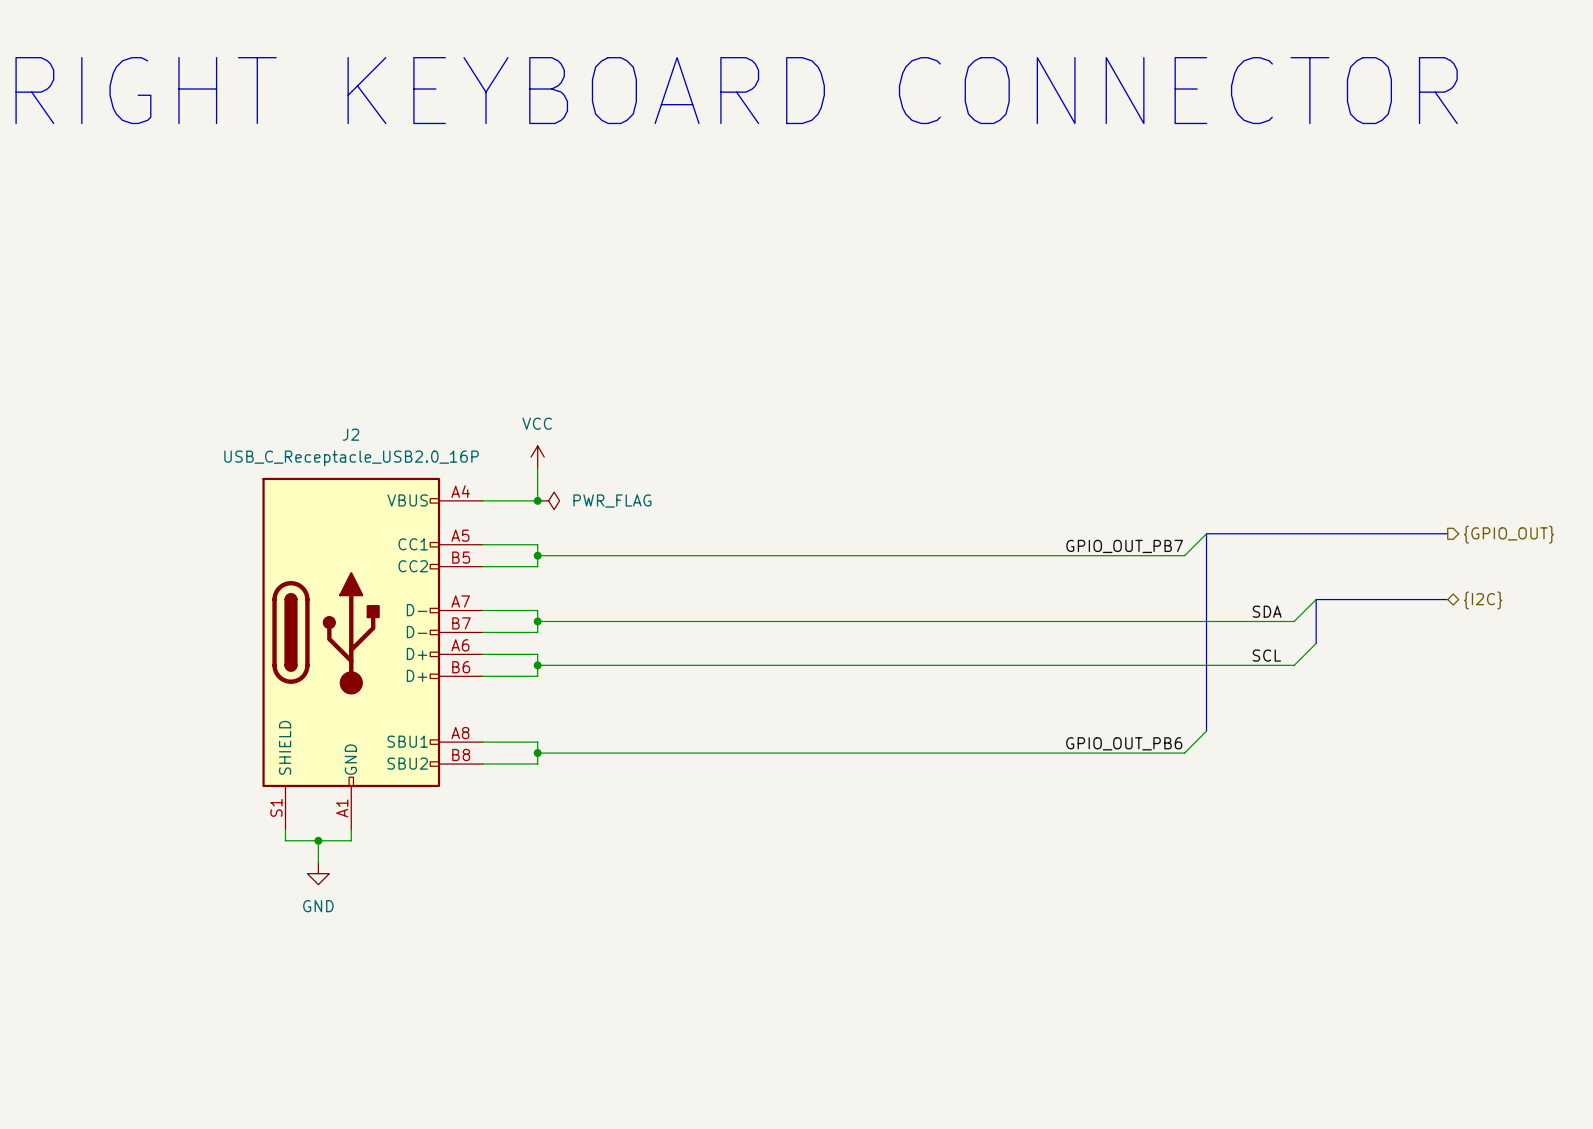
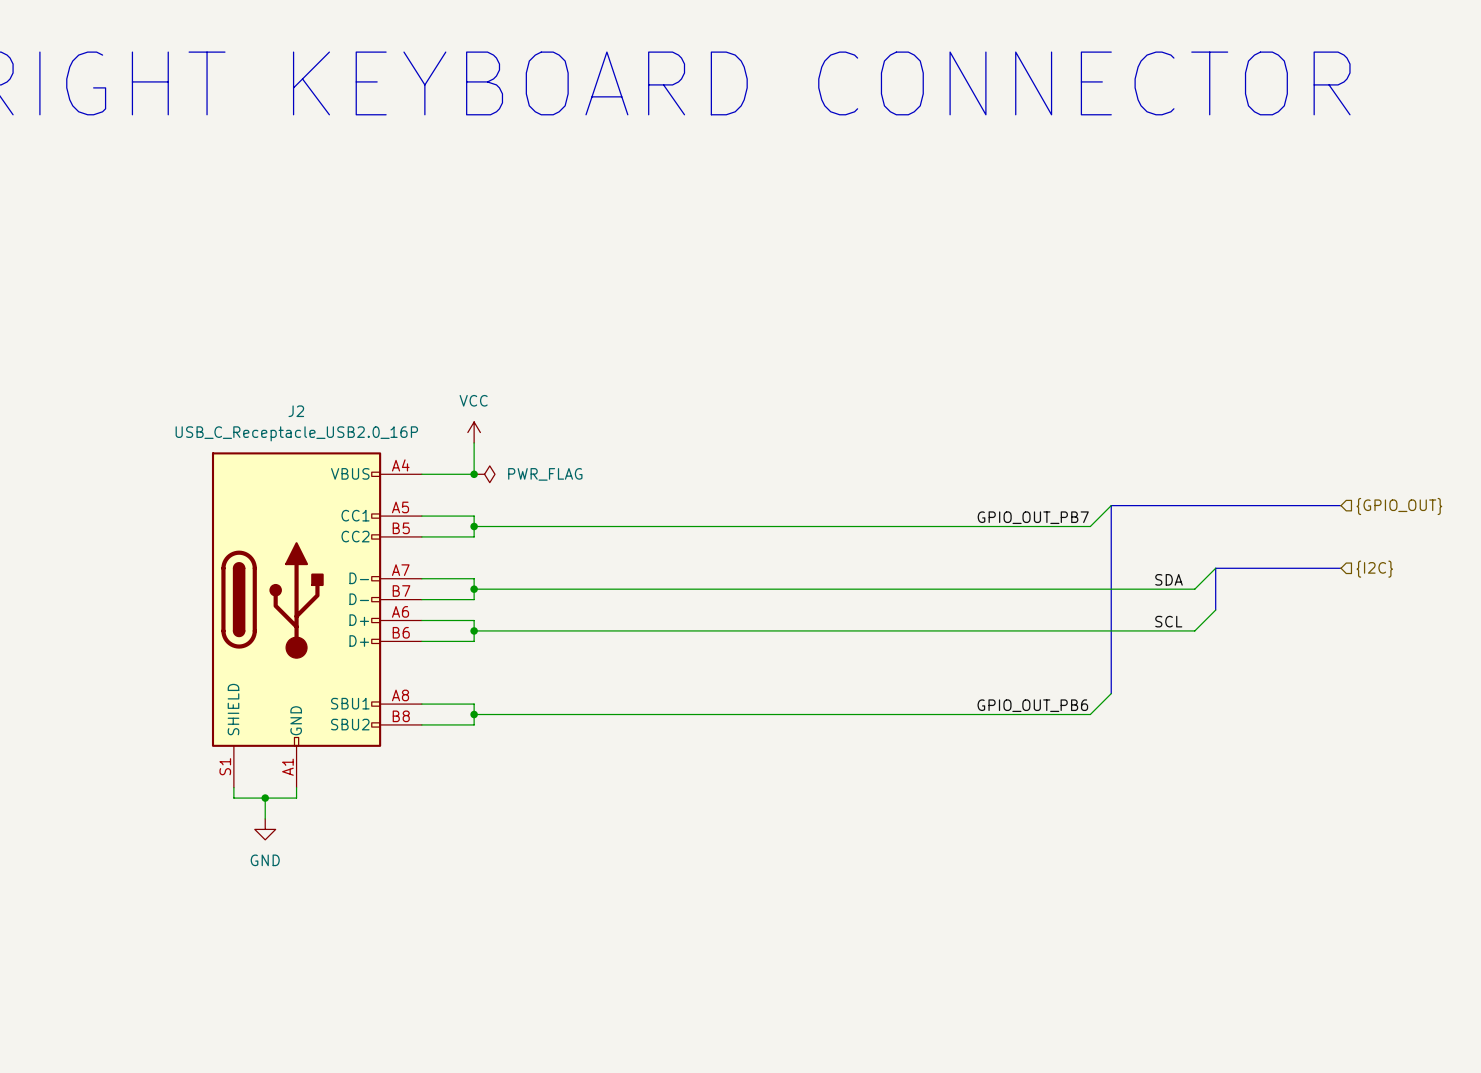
hierarchical label shape: output (1508, 534) -> input (1399, 506)
hierarchical label shape: bidirectional (1483, 600) -> input (1374, 569)

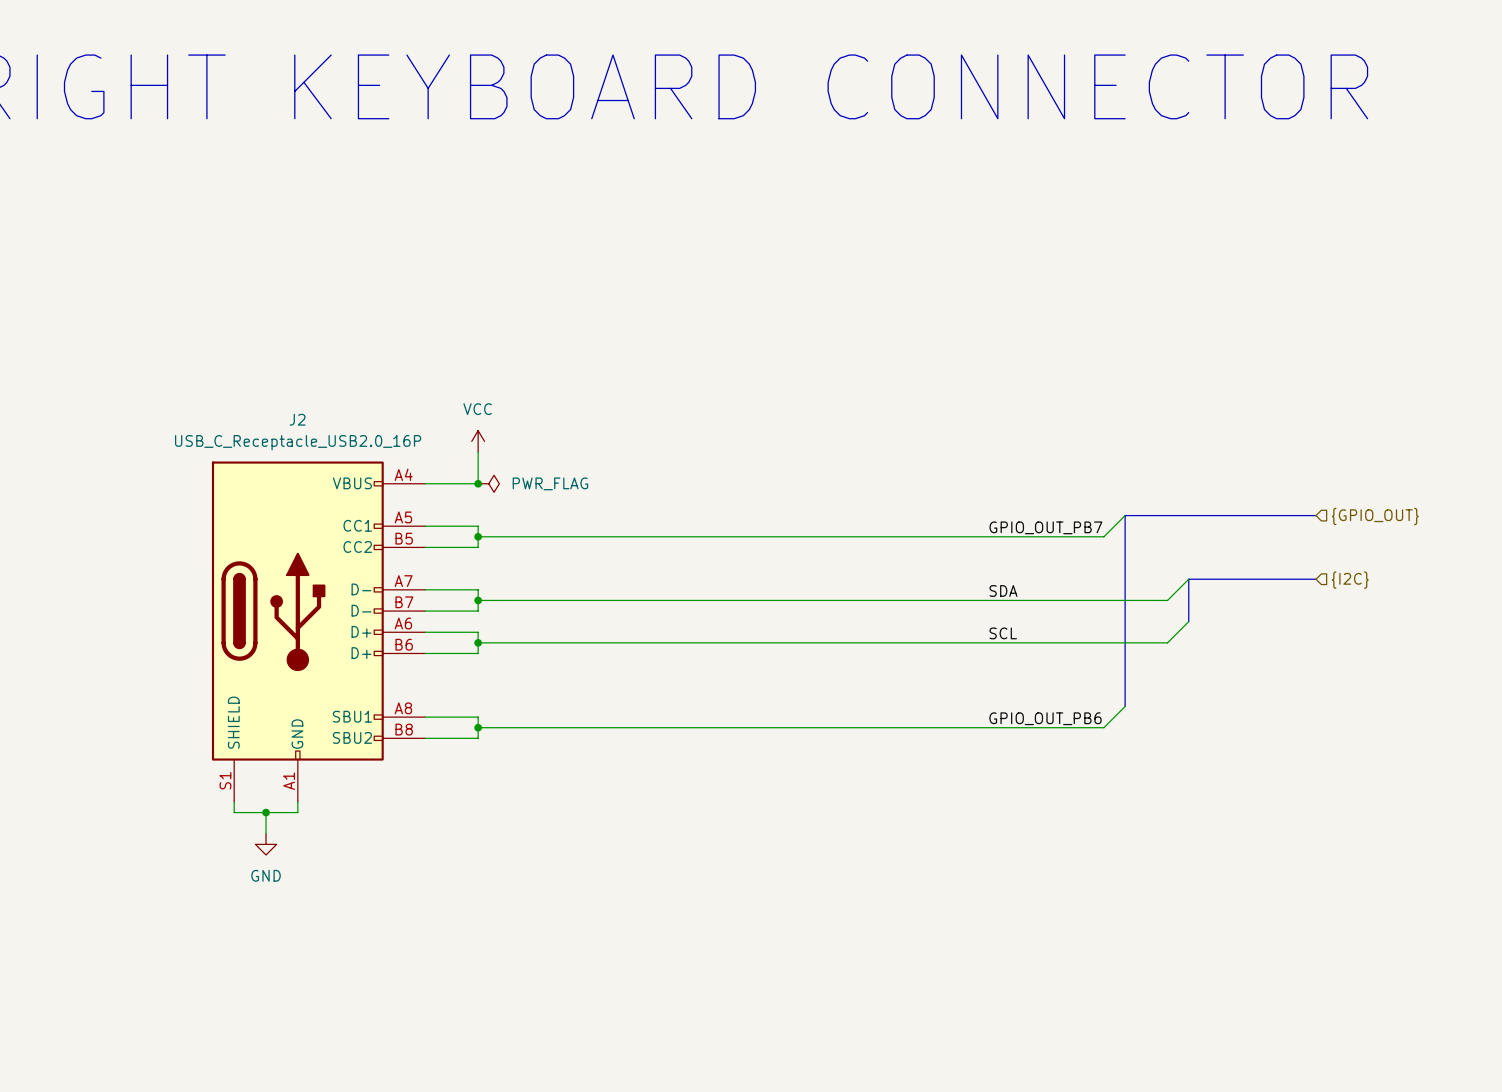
bus: (1299, 505) (1341, 505) -> none
hierarchical label position: {GPIO_OUT} (1399, 506) -> {GPIO_OUT} (1375, 516)
wire: (1215, 568) (1194, 589) (1153, 589) -> (1188, 579) (1167, 600)
bus: (1215, 568) (1215, 610) -> (1231, 579) (1188, 579) (1188, 621)
bus: (1299, 568) (1341, 568) -> none
hierarchical label position: {I2C} (1374, 569) -> {I2C} (1350, 580)
label position: SDA (1169, 579) -> SDA (1003, 590)
wire: (1215, 610) (1194, 630) (1153, 630) -> (1188, 621) (1167, 642)
label position: SCL (1168, 621) -> SCL (1003, 633)

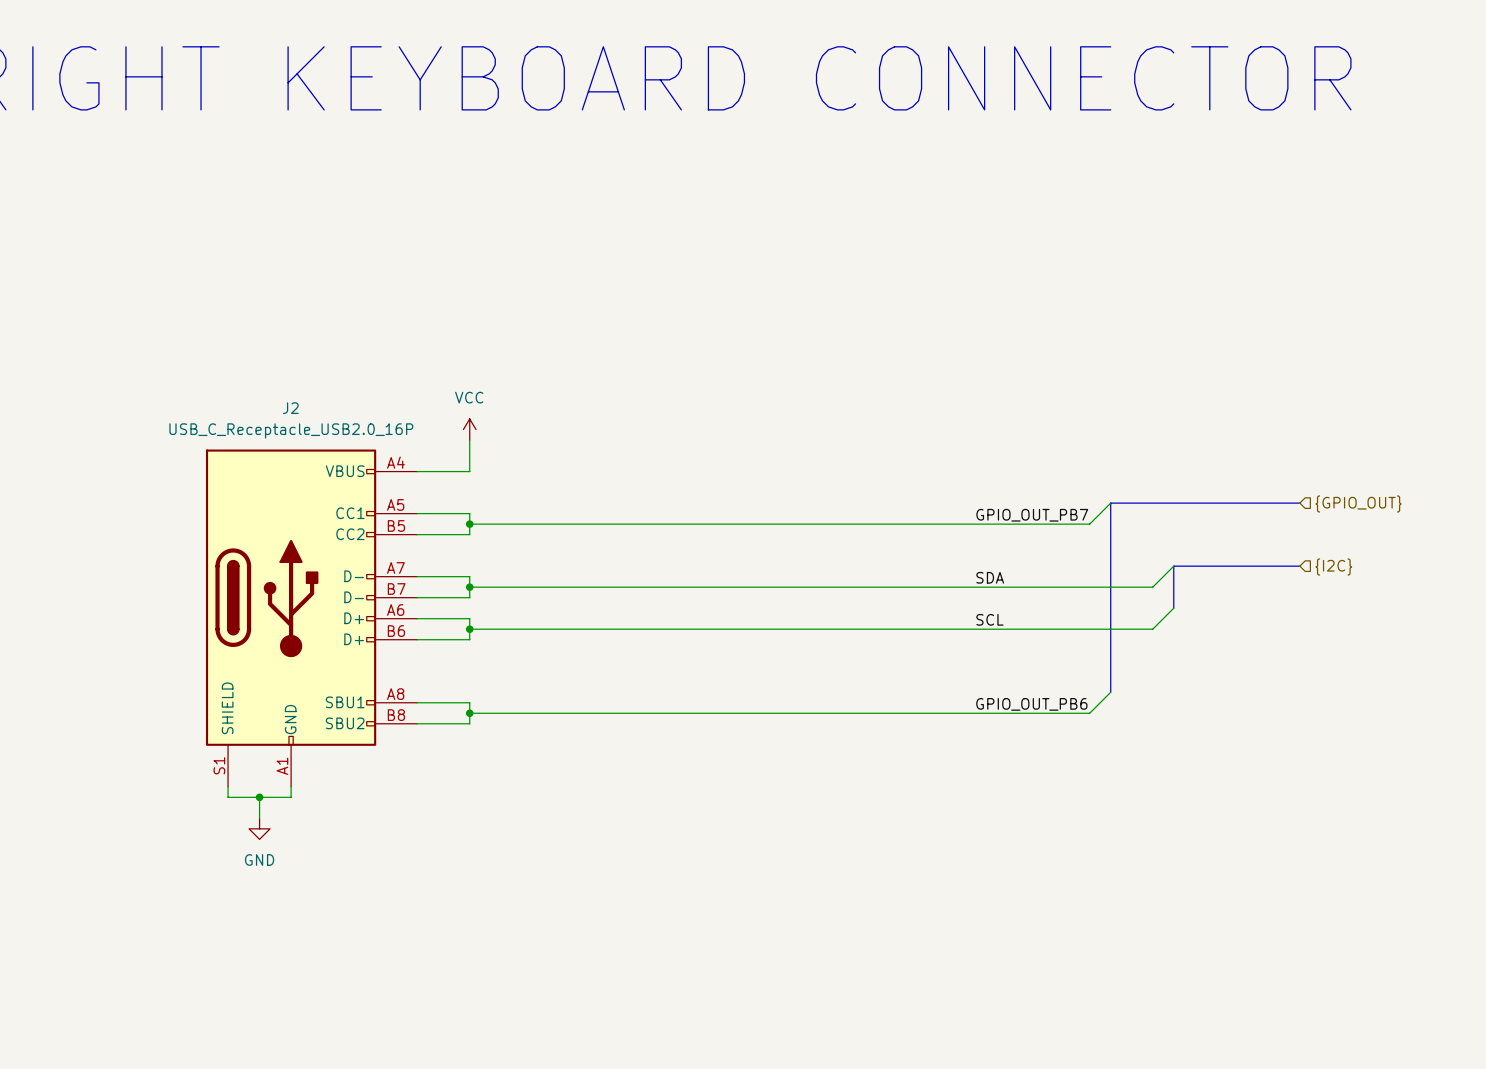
junction: (478, 483) -> none
power symbol: PWR_FLAG (488, 483) -> none

